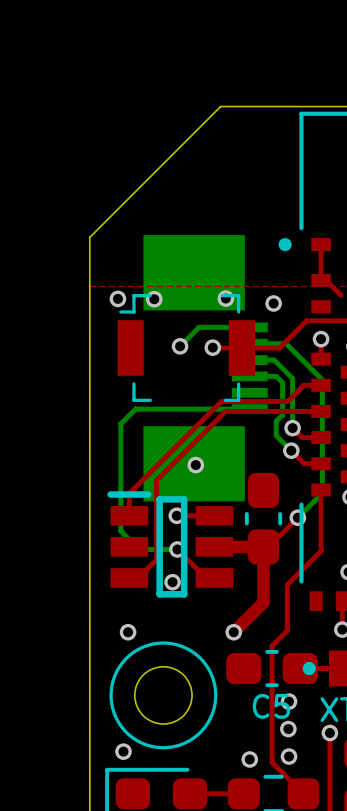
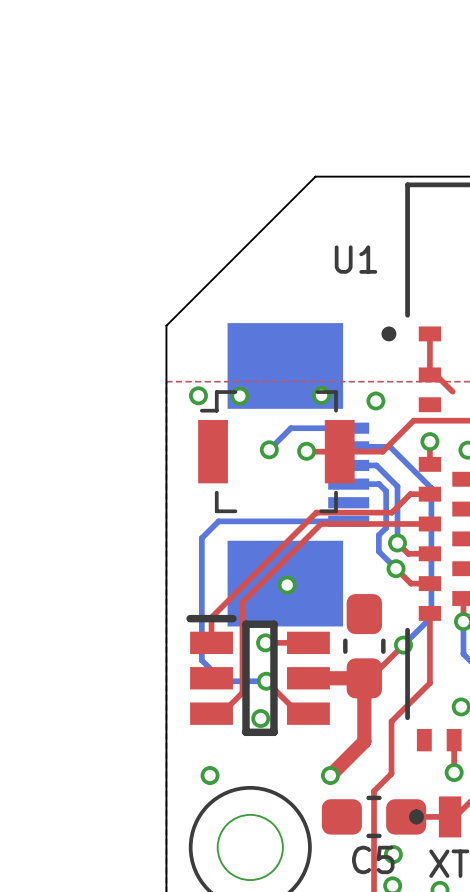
U1 name: none -> U1 (355, 259)

